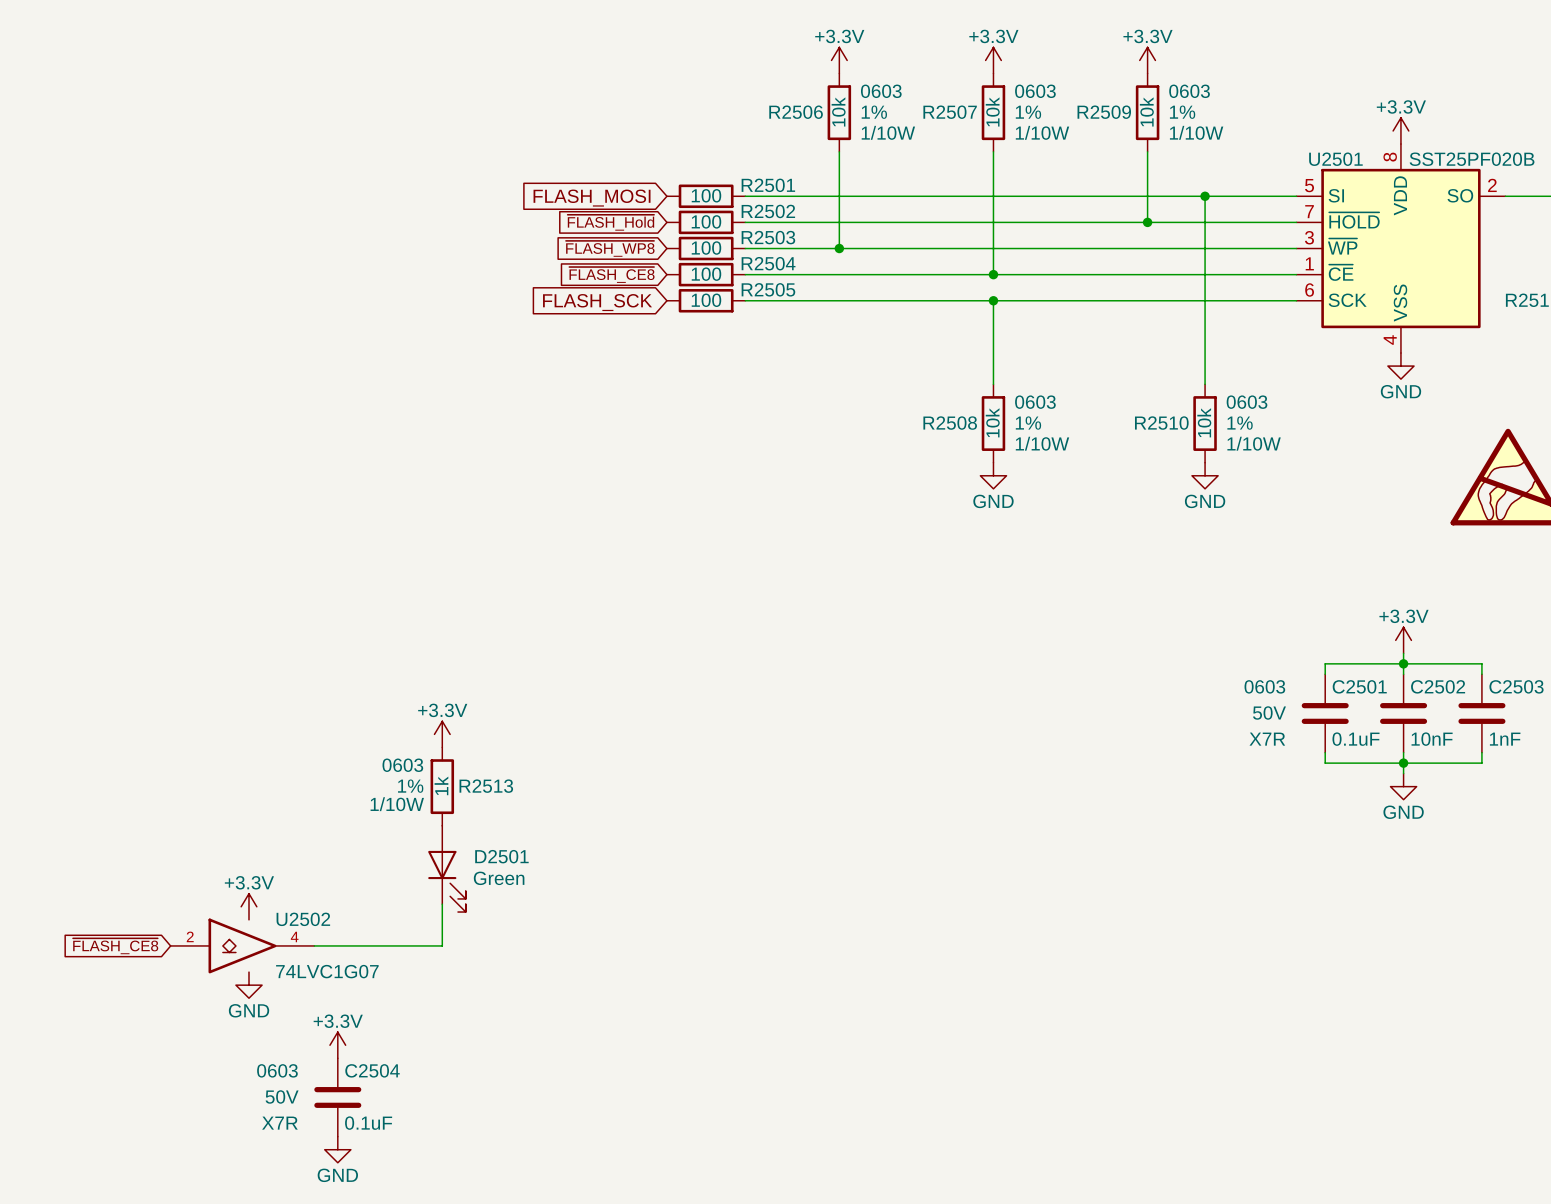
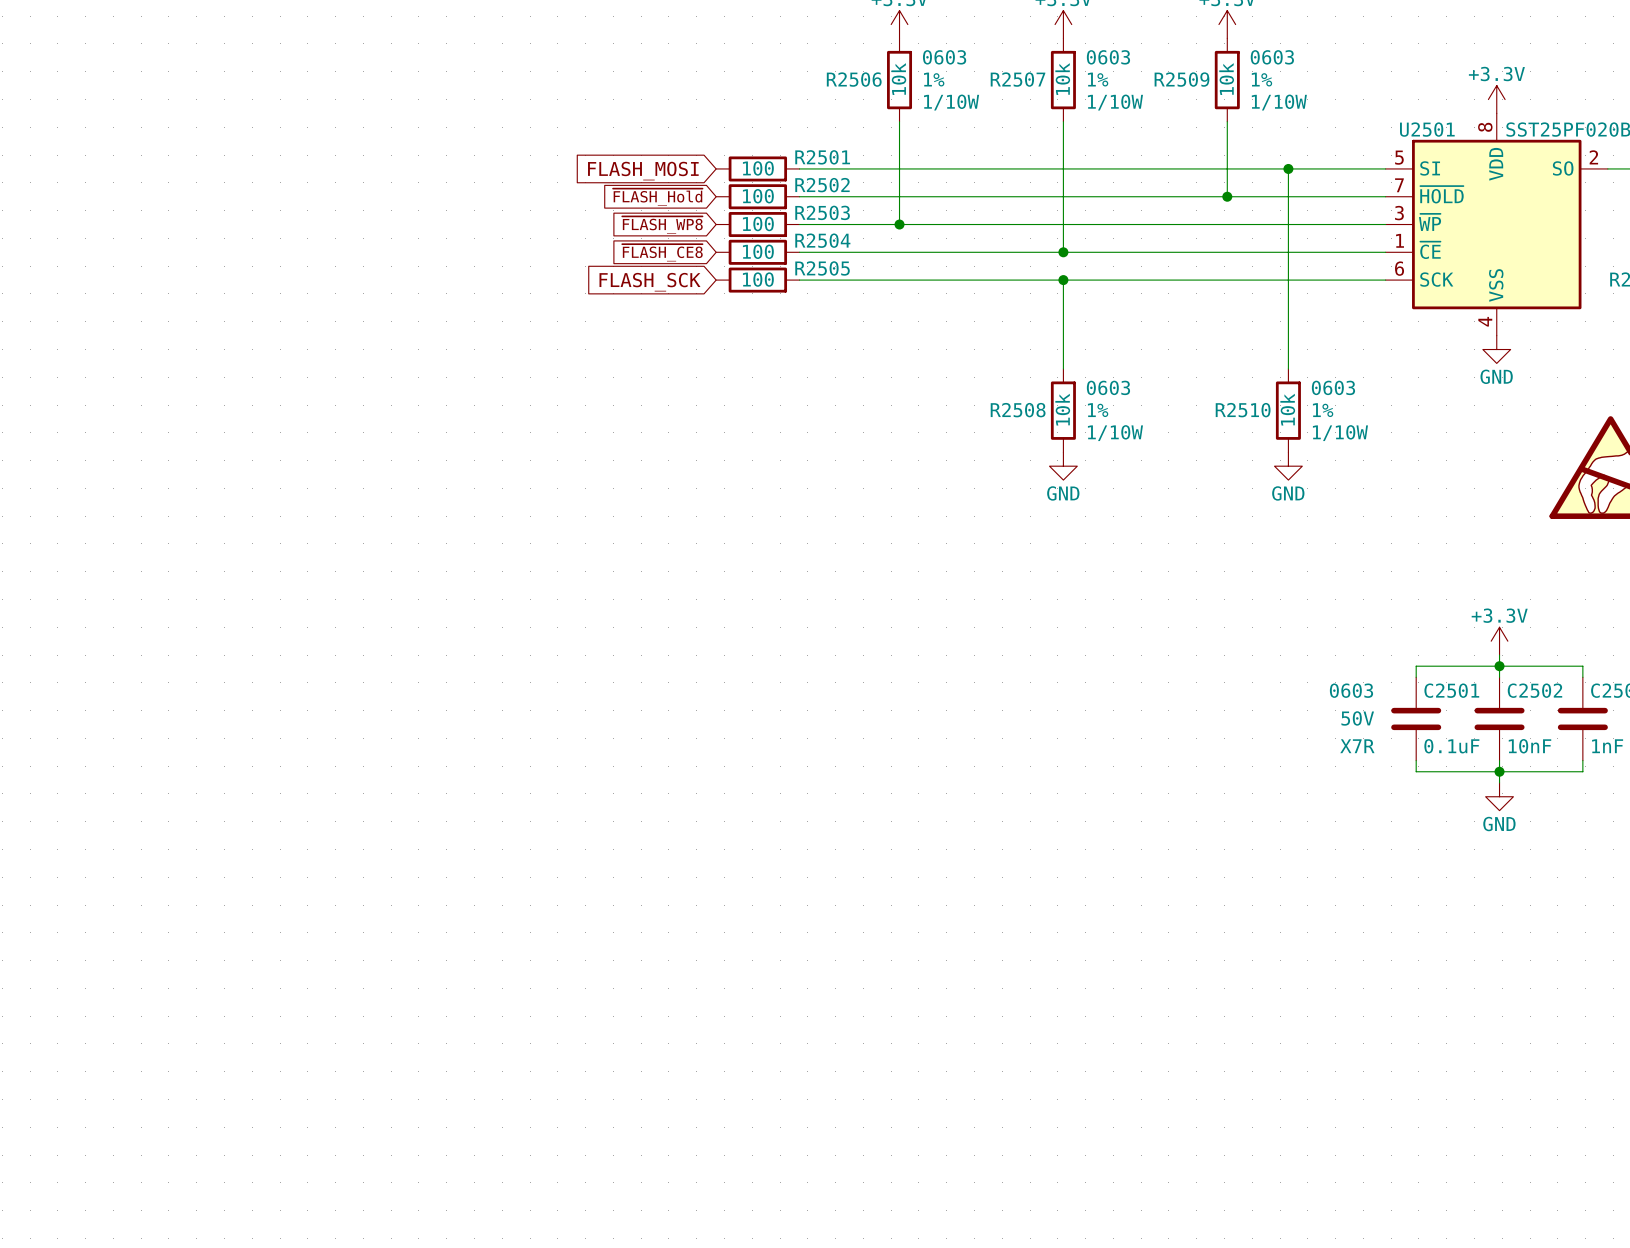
power symbol: +3.3V (442, 734) -> none
R2513: 1k (442, 786) -> none
D2501: Green (447, 868) -> none
wire: (442, 904) (442, 945) (314, 945) -> none
power symbol: +3.3V (249, 906) -> none
U2502: 74LVC1G07 (242, 945) -> none
global label: ~{FLASH_CE8} (115, 946) -> none
power symbol: GND (249, 985) -> none
power symbol: +3.3V (337, 1045) -> none
C2504: 0.1uF (337, 1097) -> none
power symbol: GND (337, 1149) -> none

